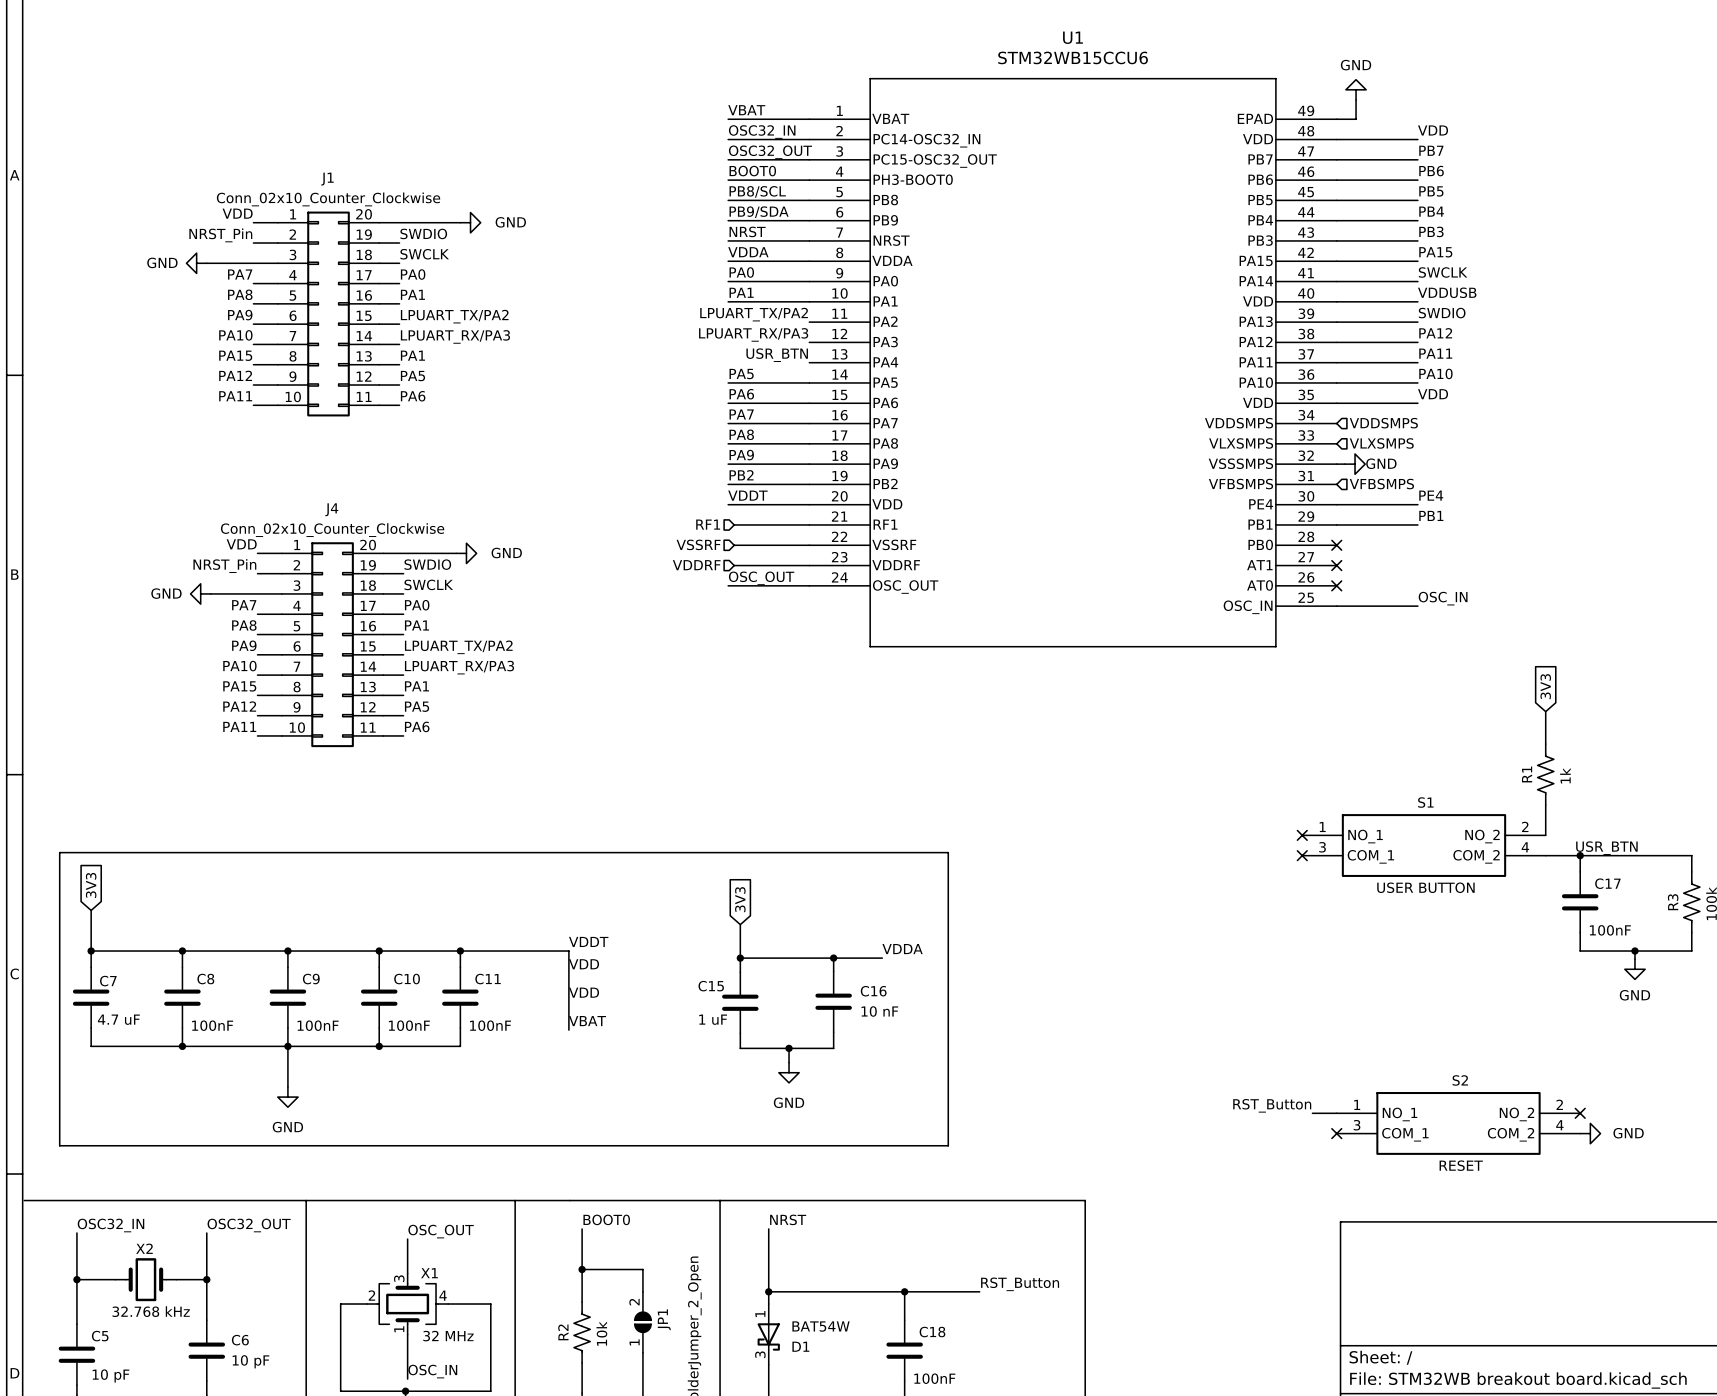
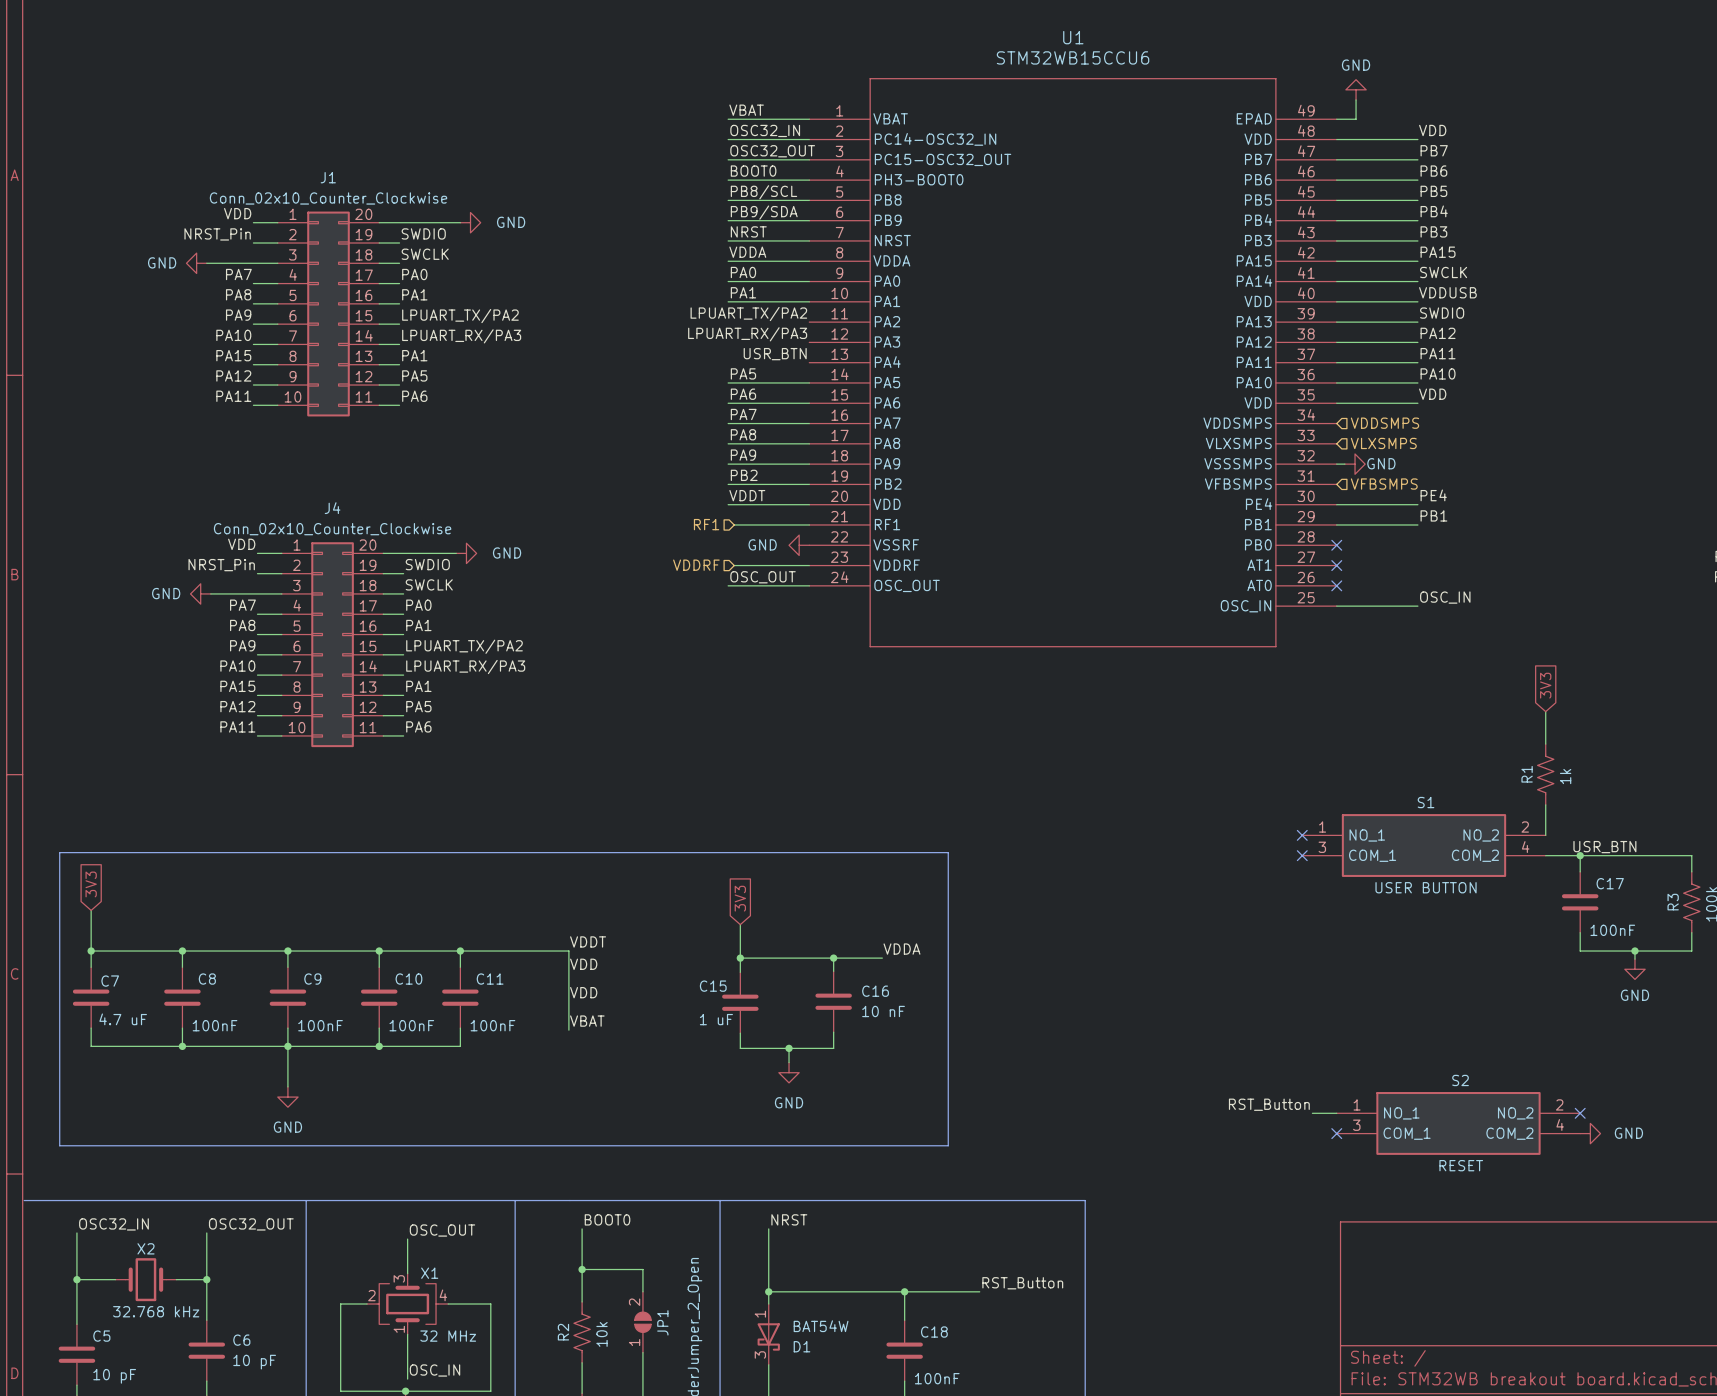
hierarchical label: VSSRF (698, 544) -> none
wire: (734, 545) (809, 545) -> none
power symbol: none -> GND (799, 545)

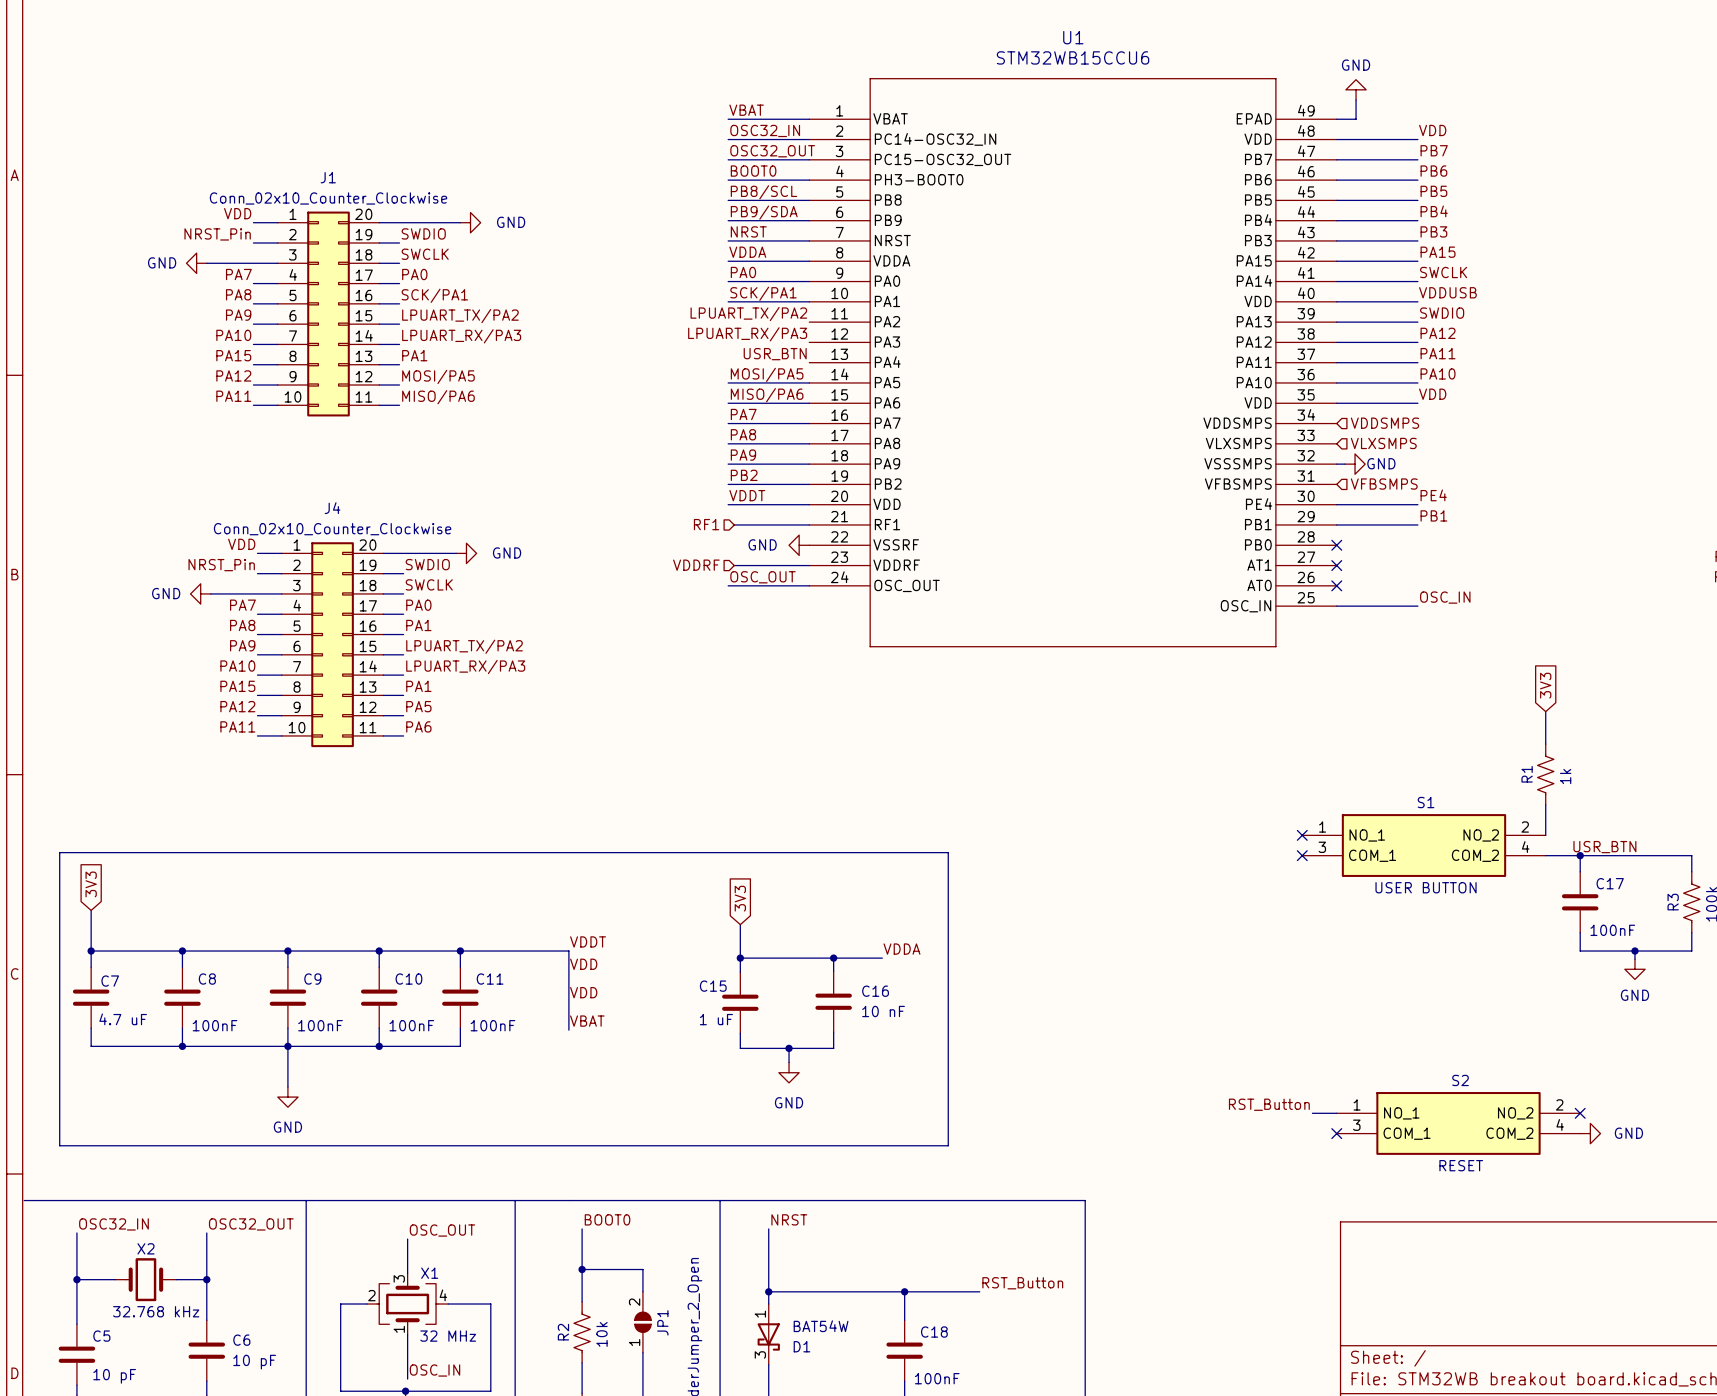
label: PA1 (743, 292) -> SCK/PA1 (763, 293)
label: PA1 (414, 294) -> SCK/PA1 (434, 295)
label: PA5 (743, 373) -> MOSI/PA5 (767, 374)
label: PA5 (414, 375) -> MOSI/PA5 (438, 376)
label: PA6 (743, 394) -> MISO/PA6 (767, 395)
label: PA6 (414, 396) -> MISO/PA6 (438, 397)

